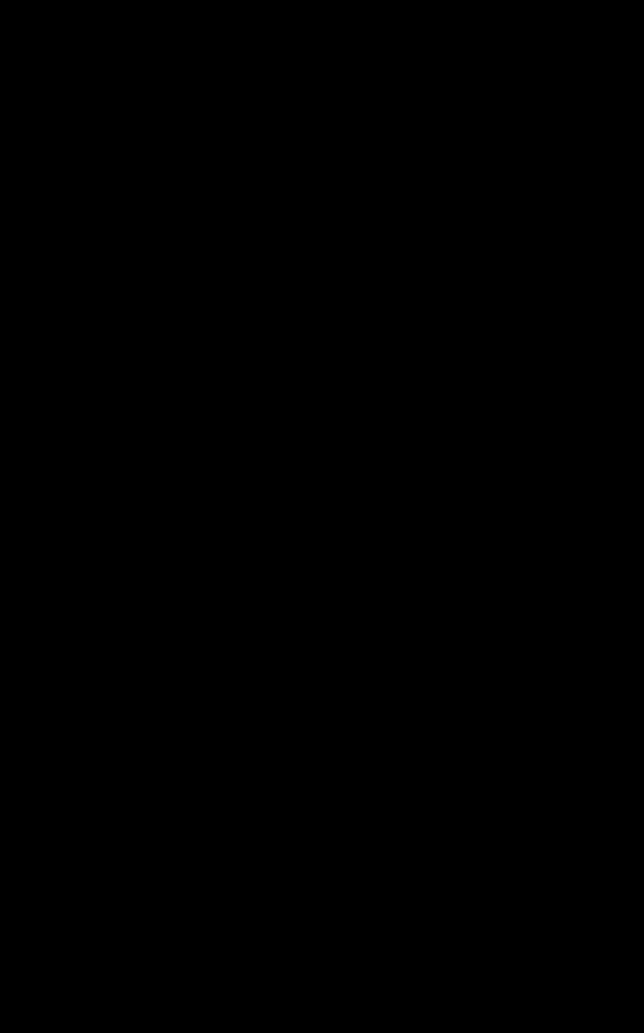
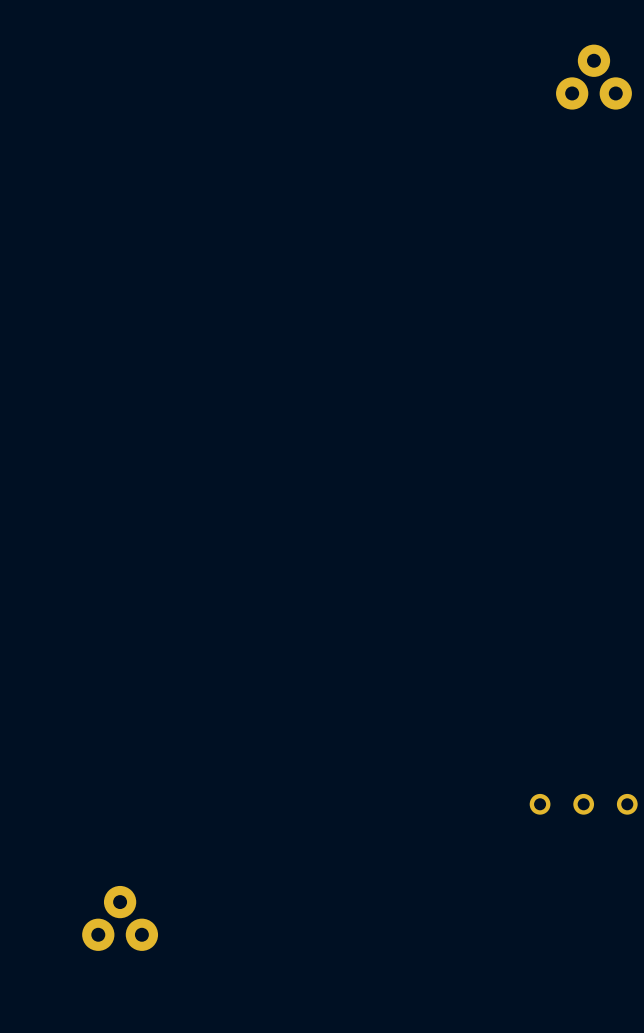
part: none -> (593, 77)
part: none -> (583, 804)
part: none -> (120, 918)

